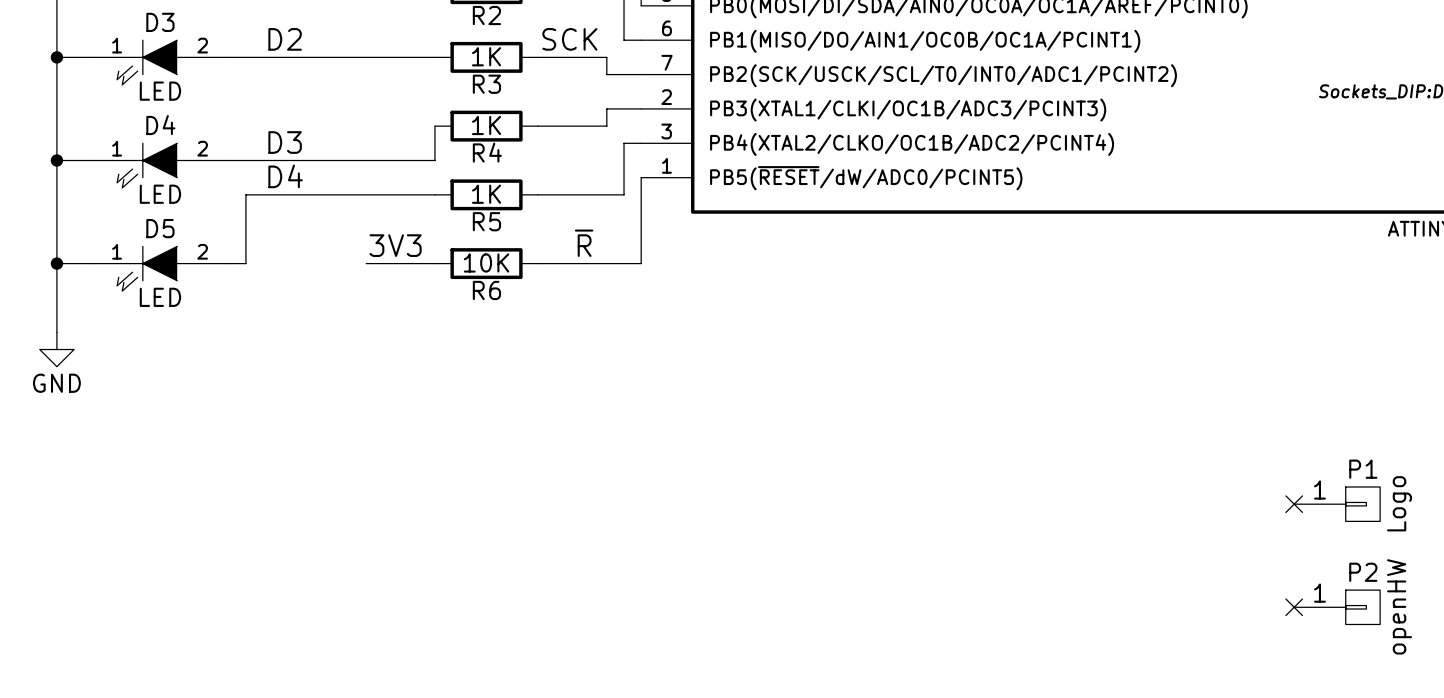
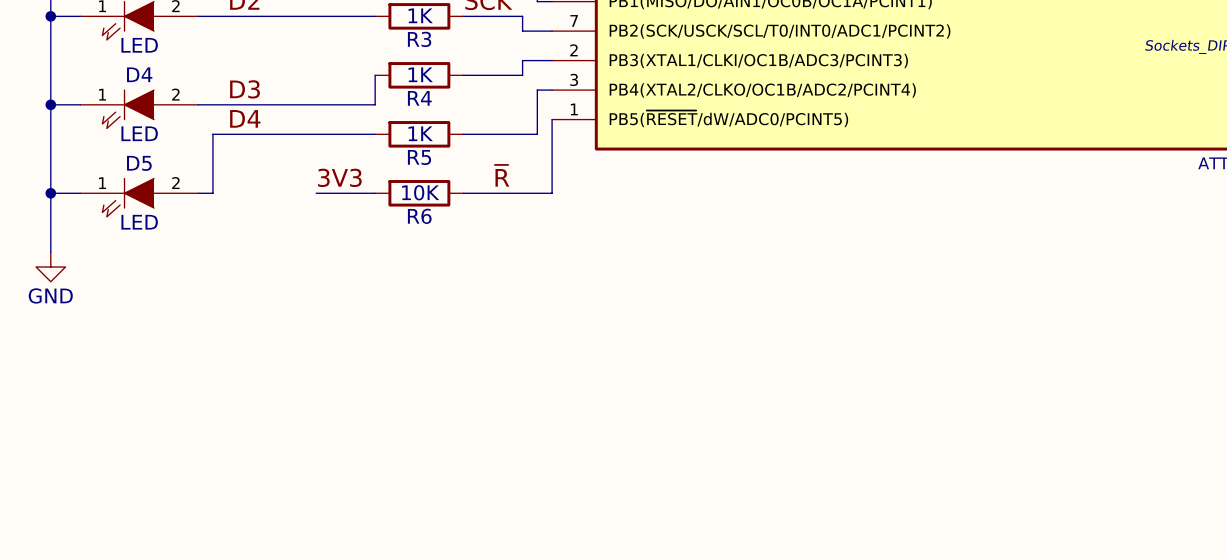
no-connect mark: (1294, 504) -> none
P1: Logo (1337, 504) -> none
no-connect mark: (1294, 607) -> none
P2: openHW (1337, 607) -> none

